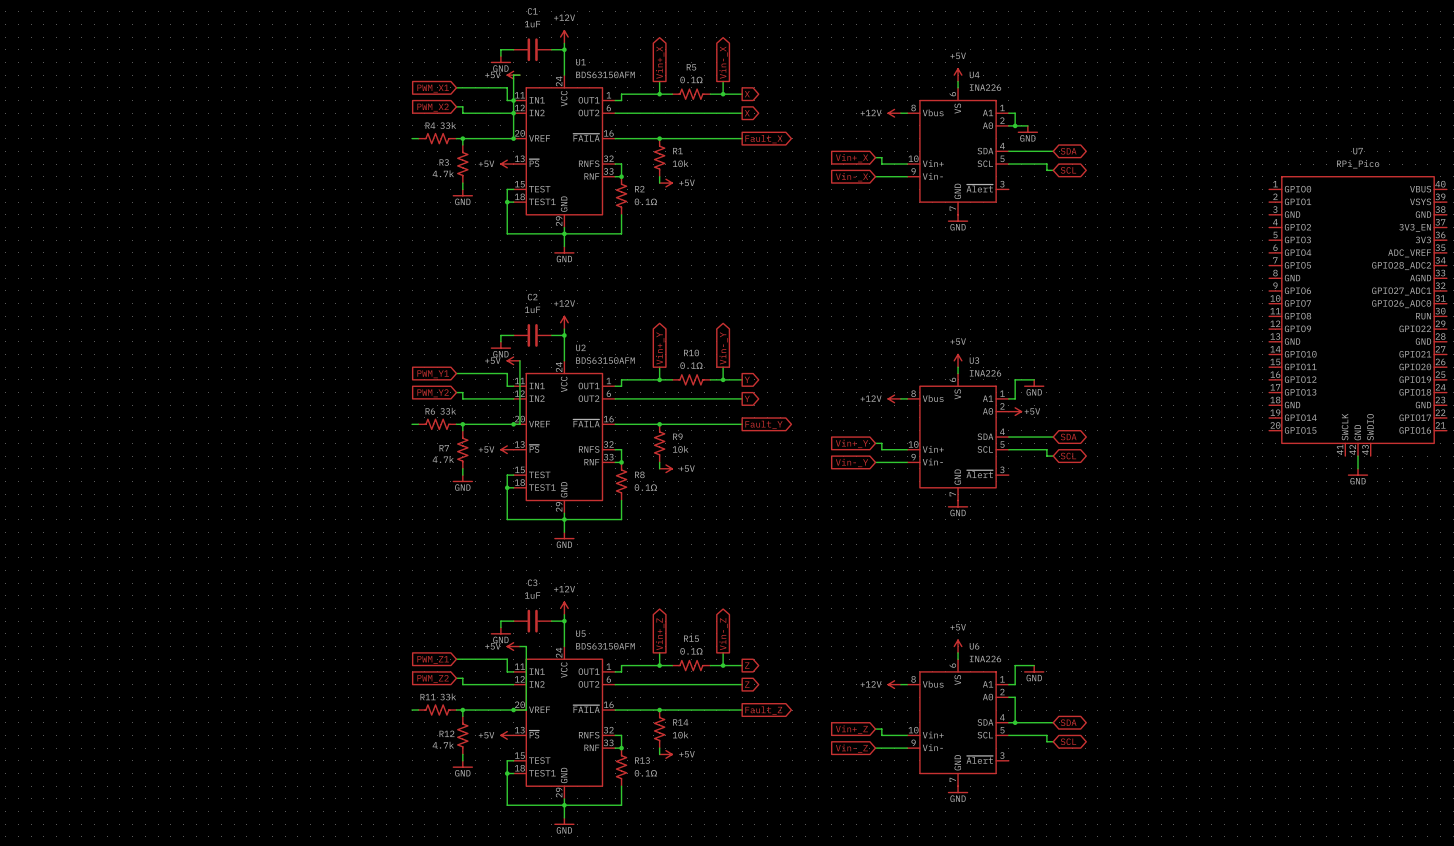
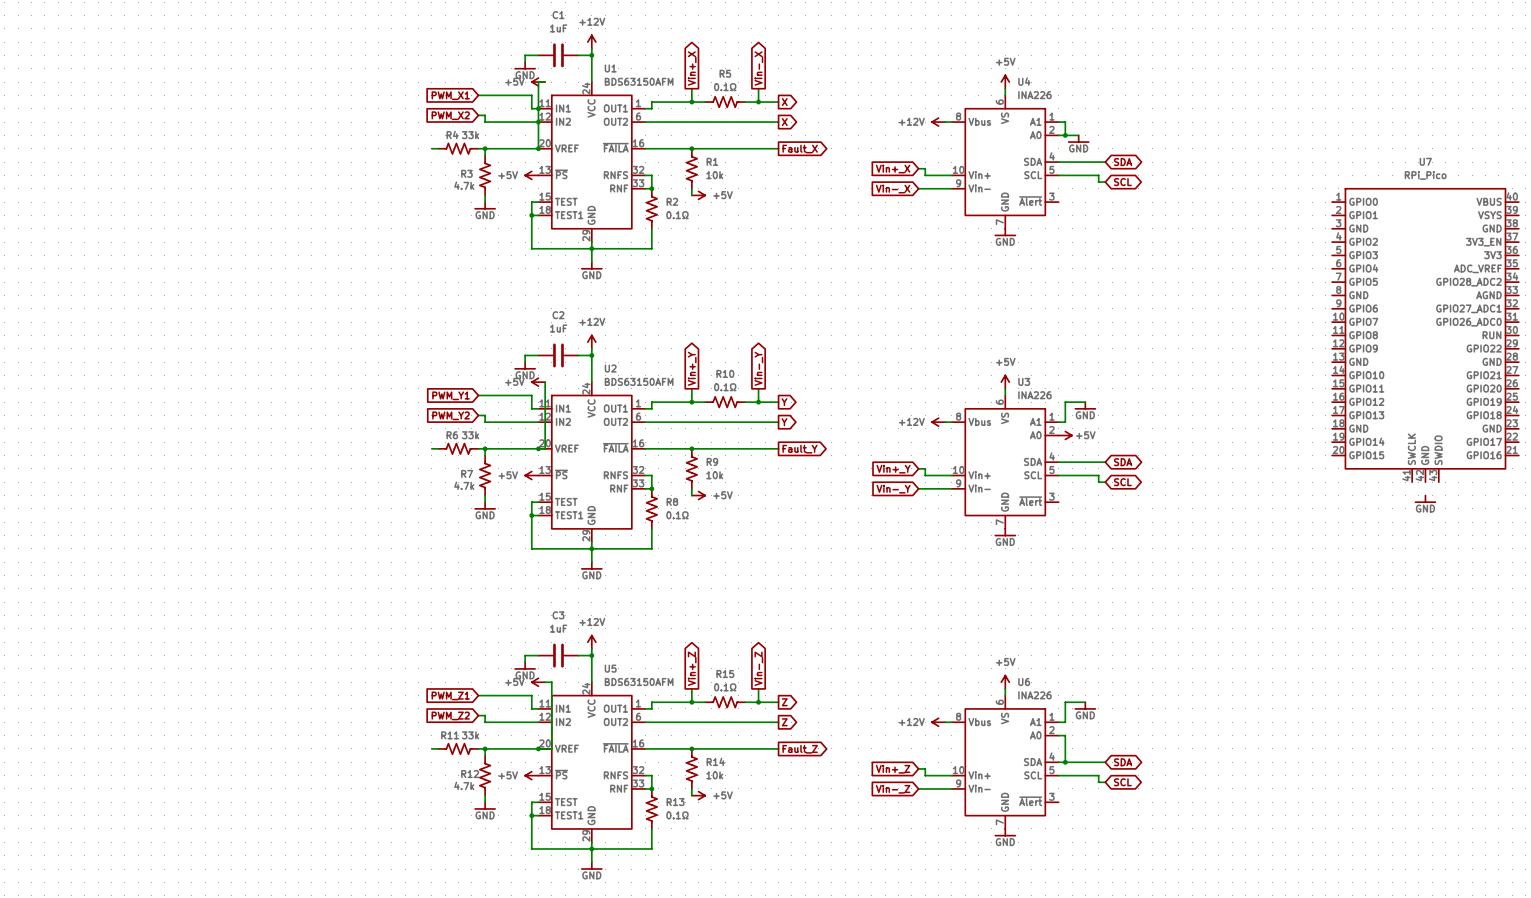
wire: (1358, 456) (1358, 468) -> none

